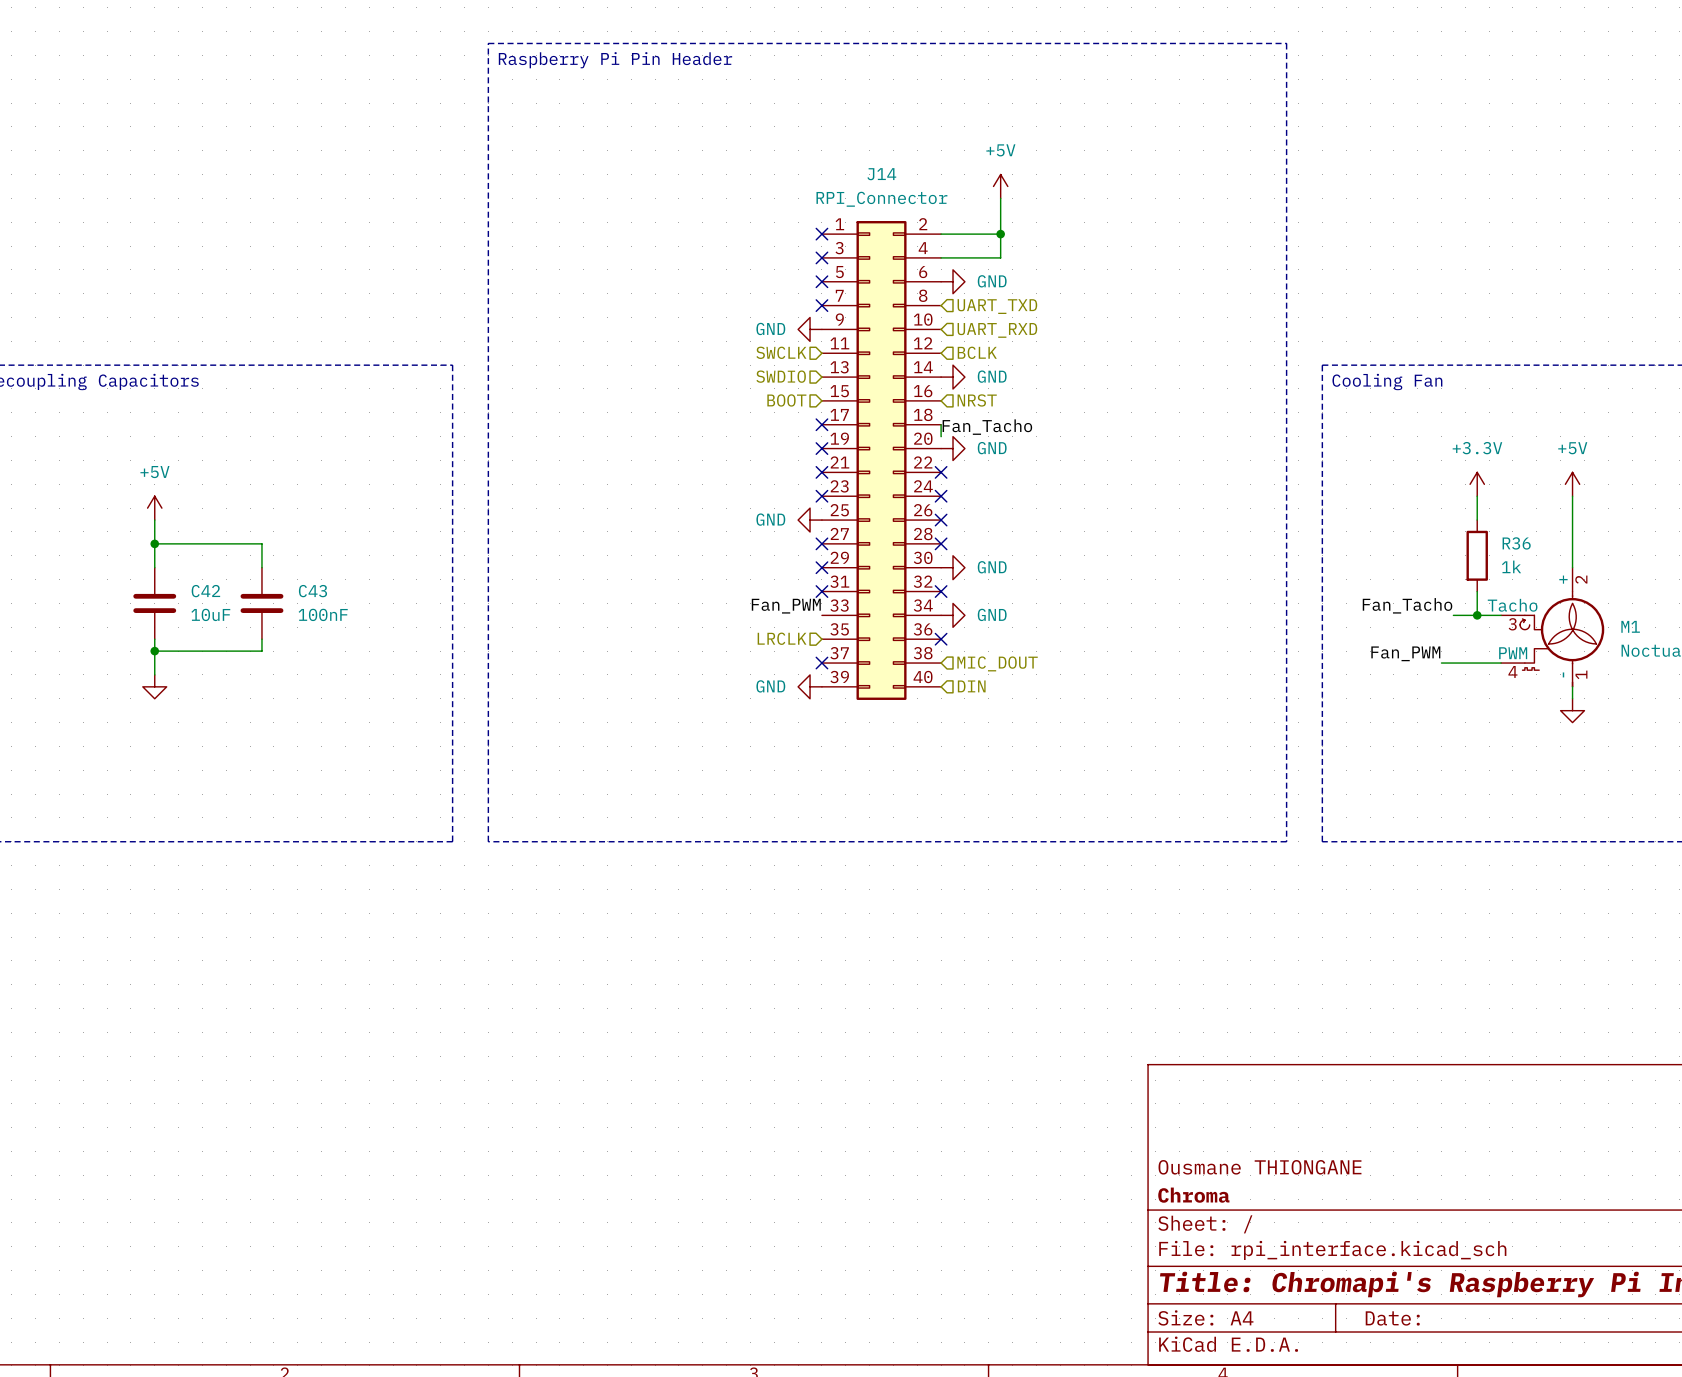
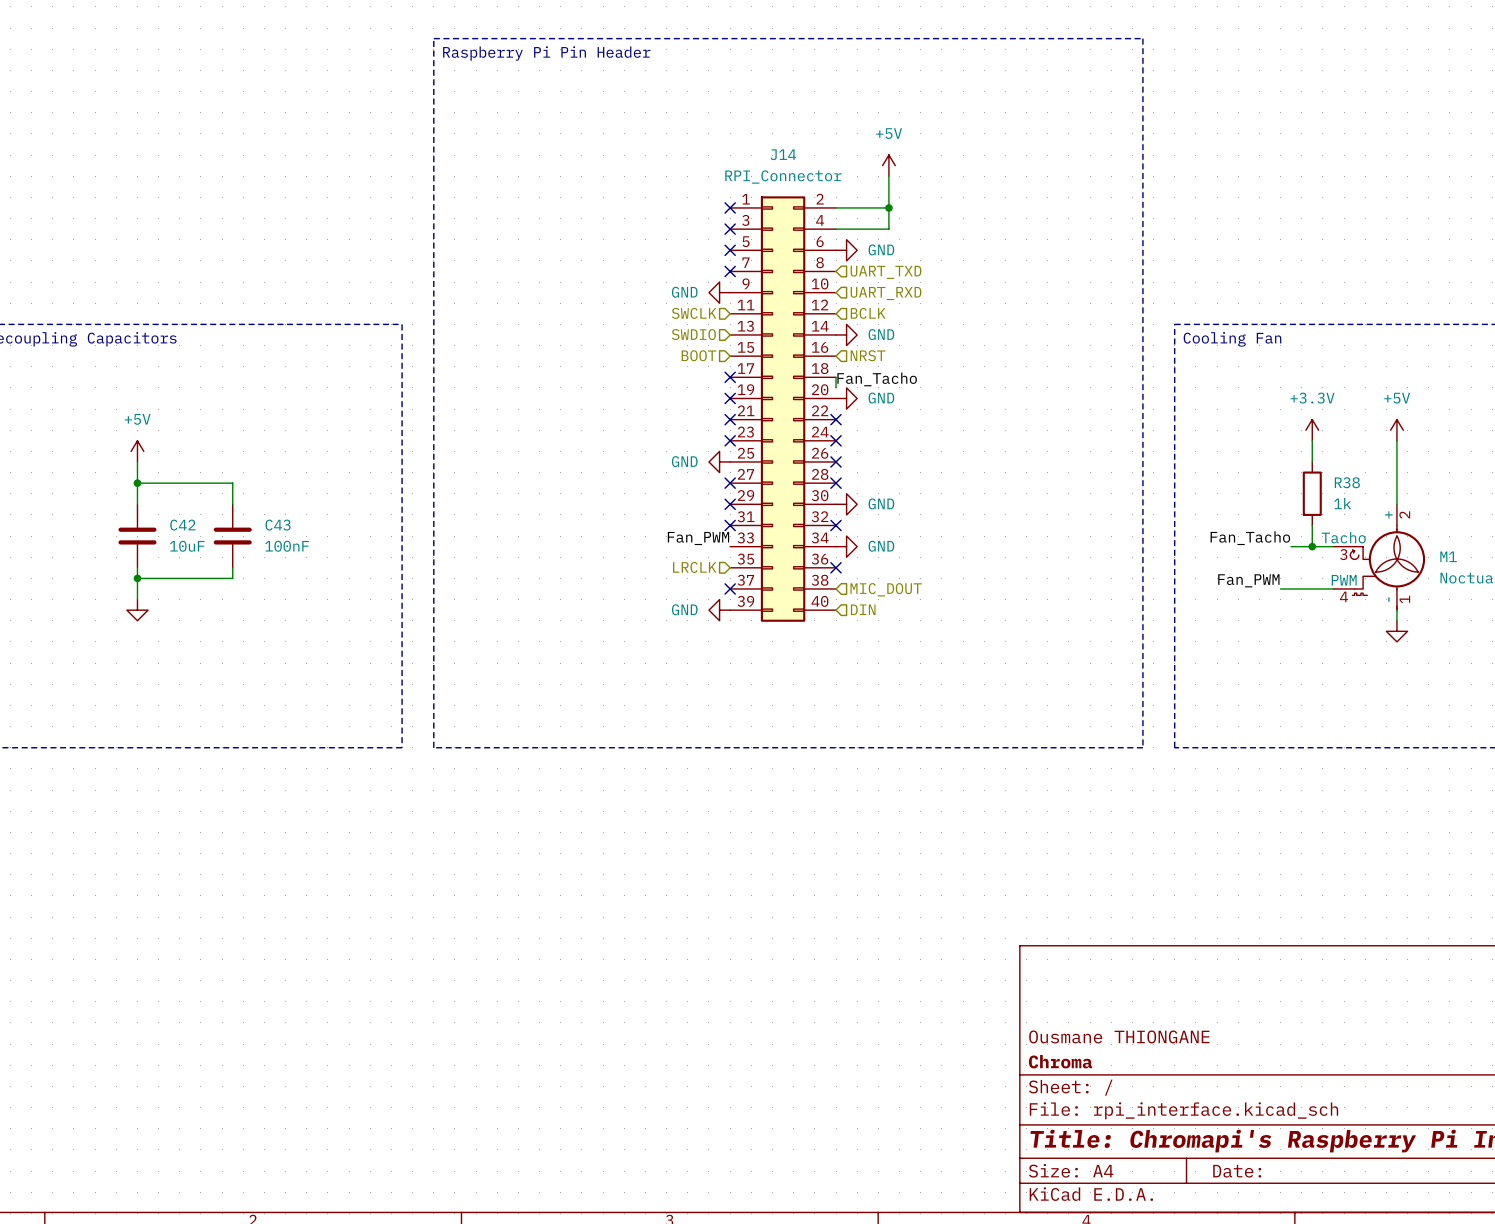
R36 name: R36 (1516, 543) -> R38 (1347, 482)

